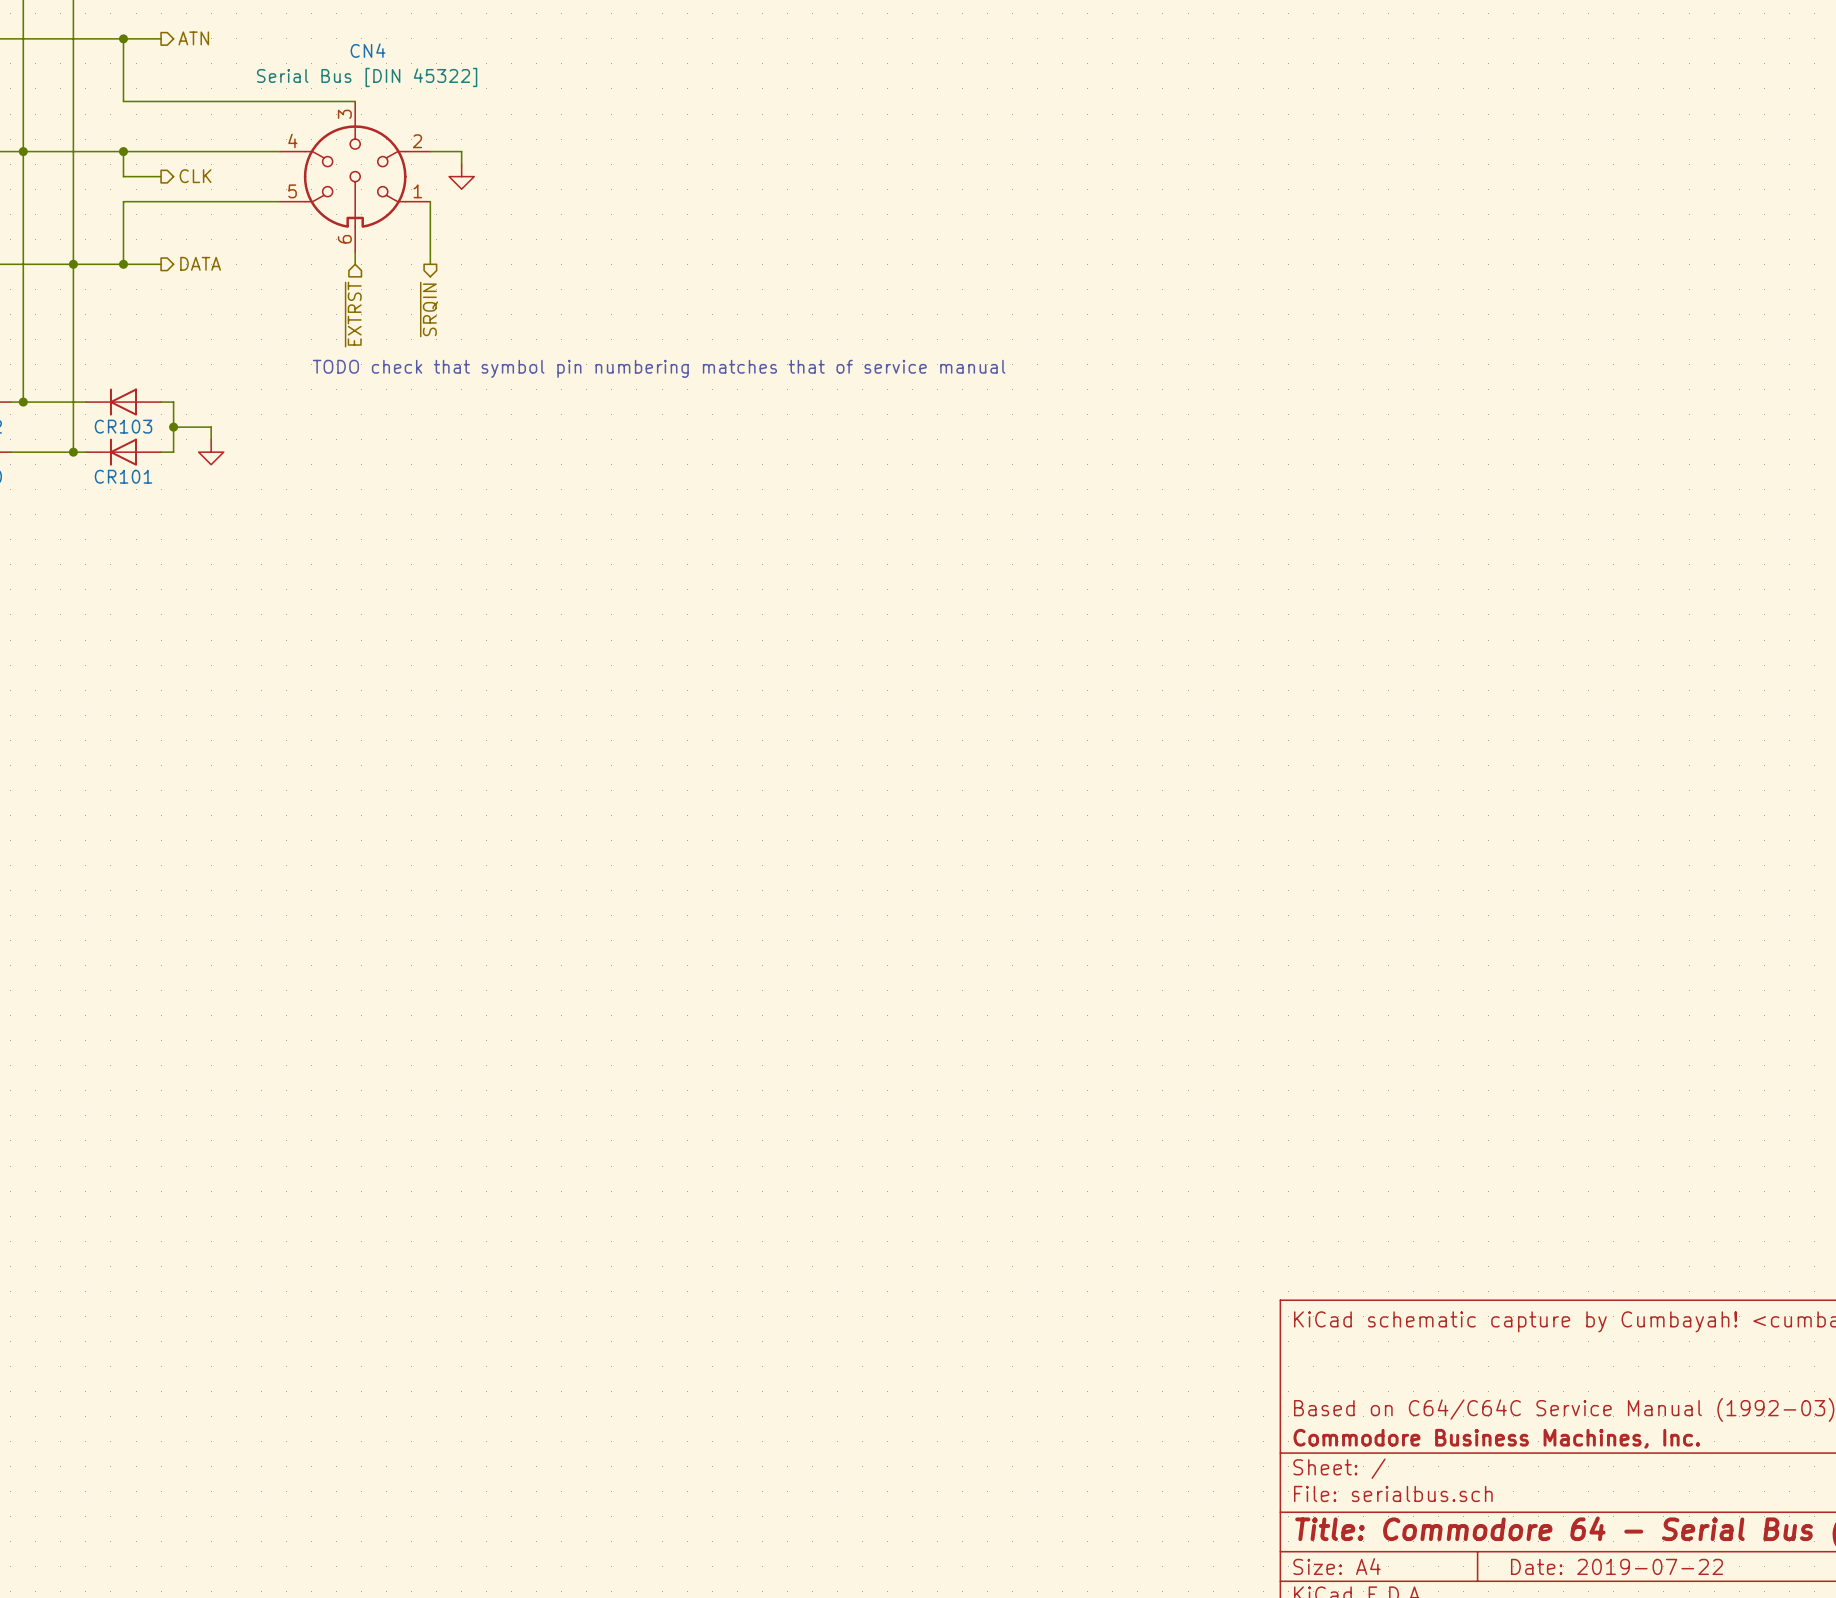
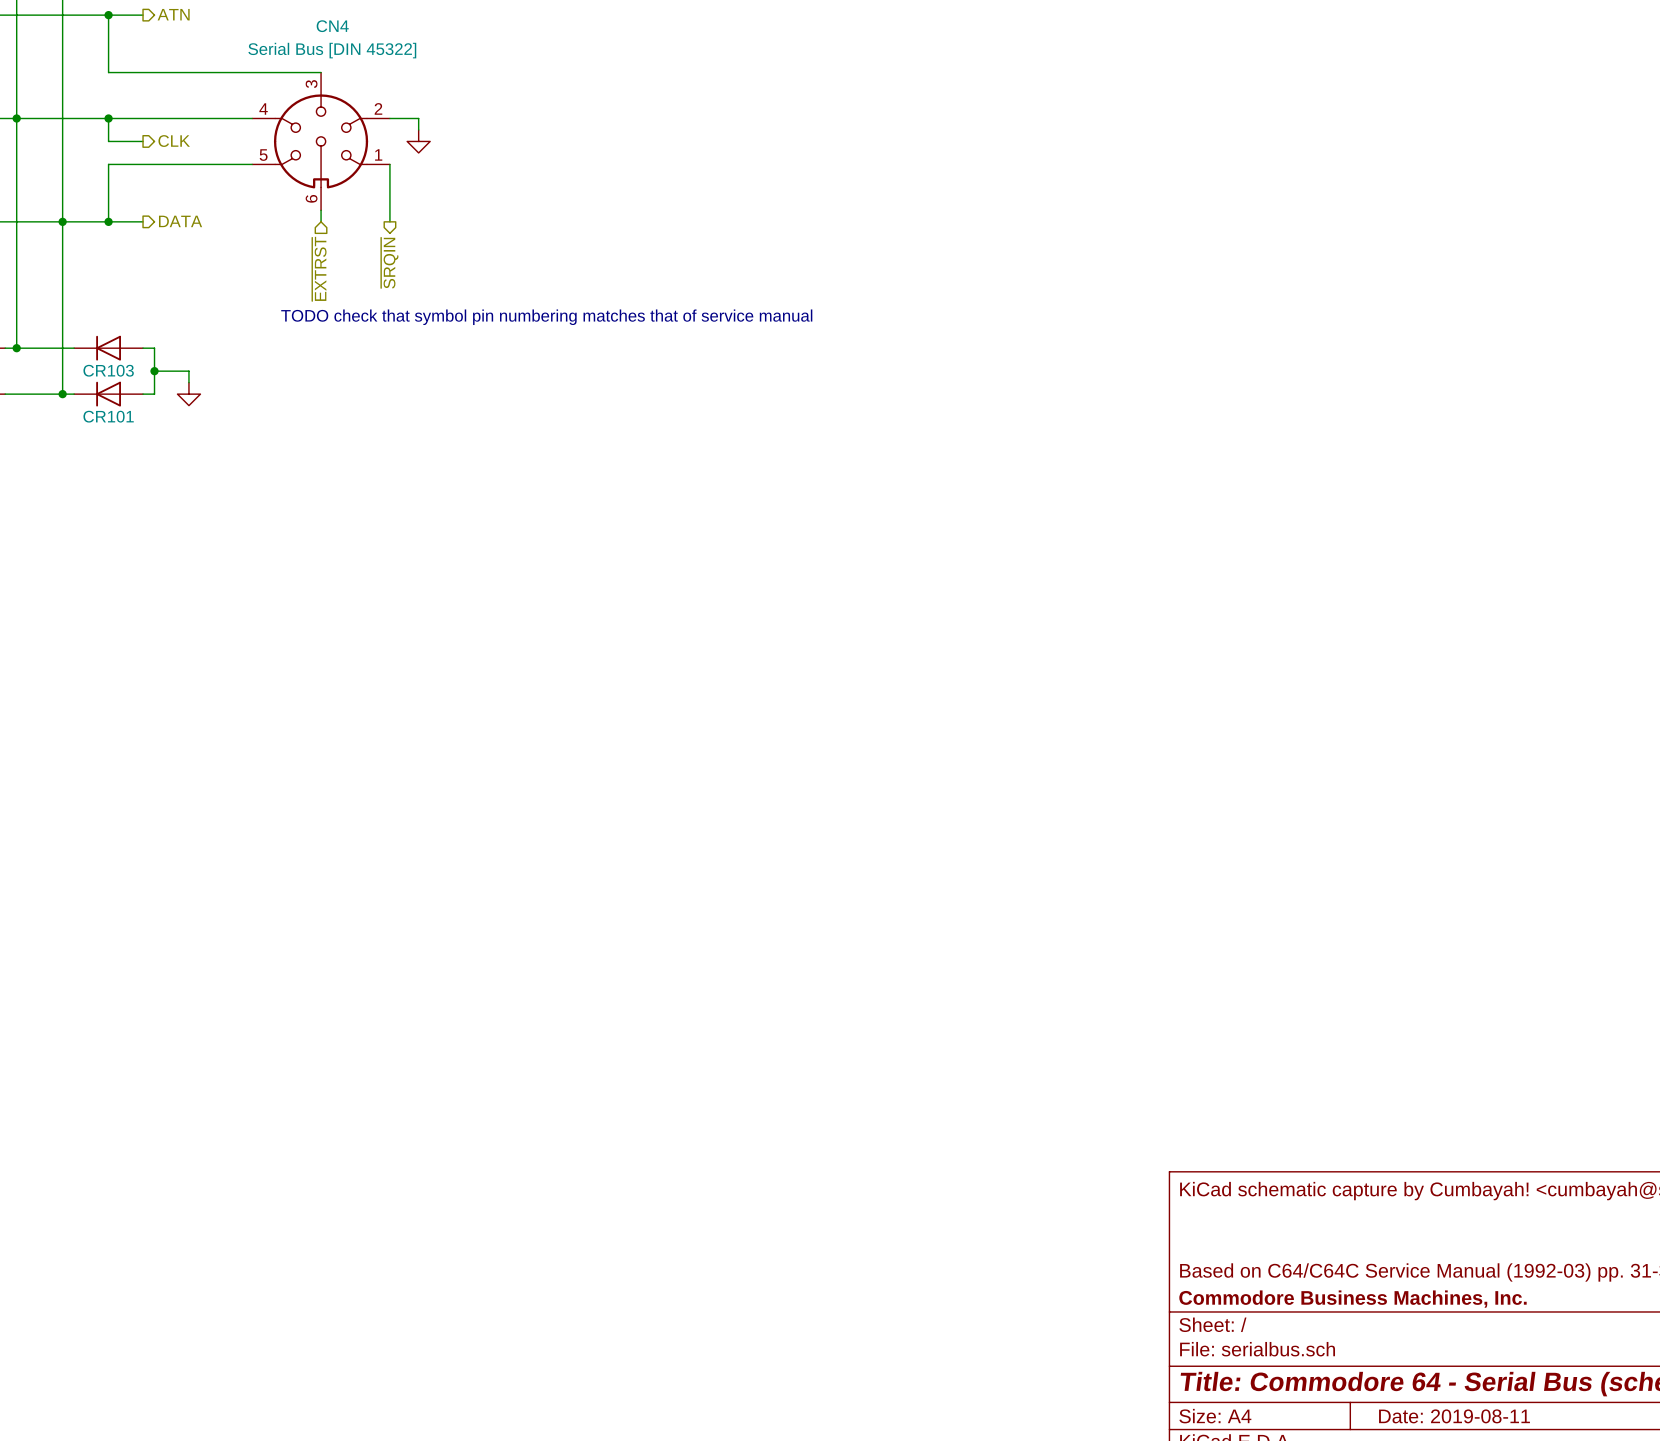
title block: Date: 2019-07-22 (1617, 1566) -> Date: 2019-08-11 (1454, 1416)

